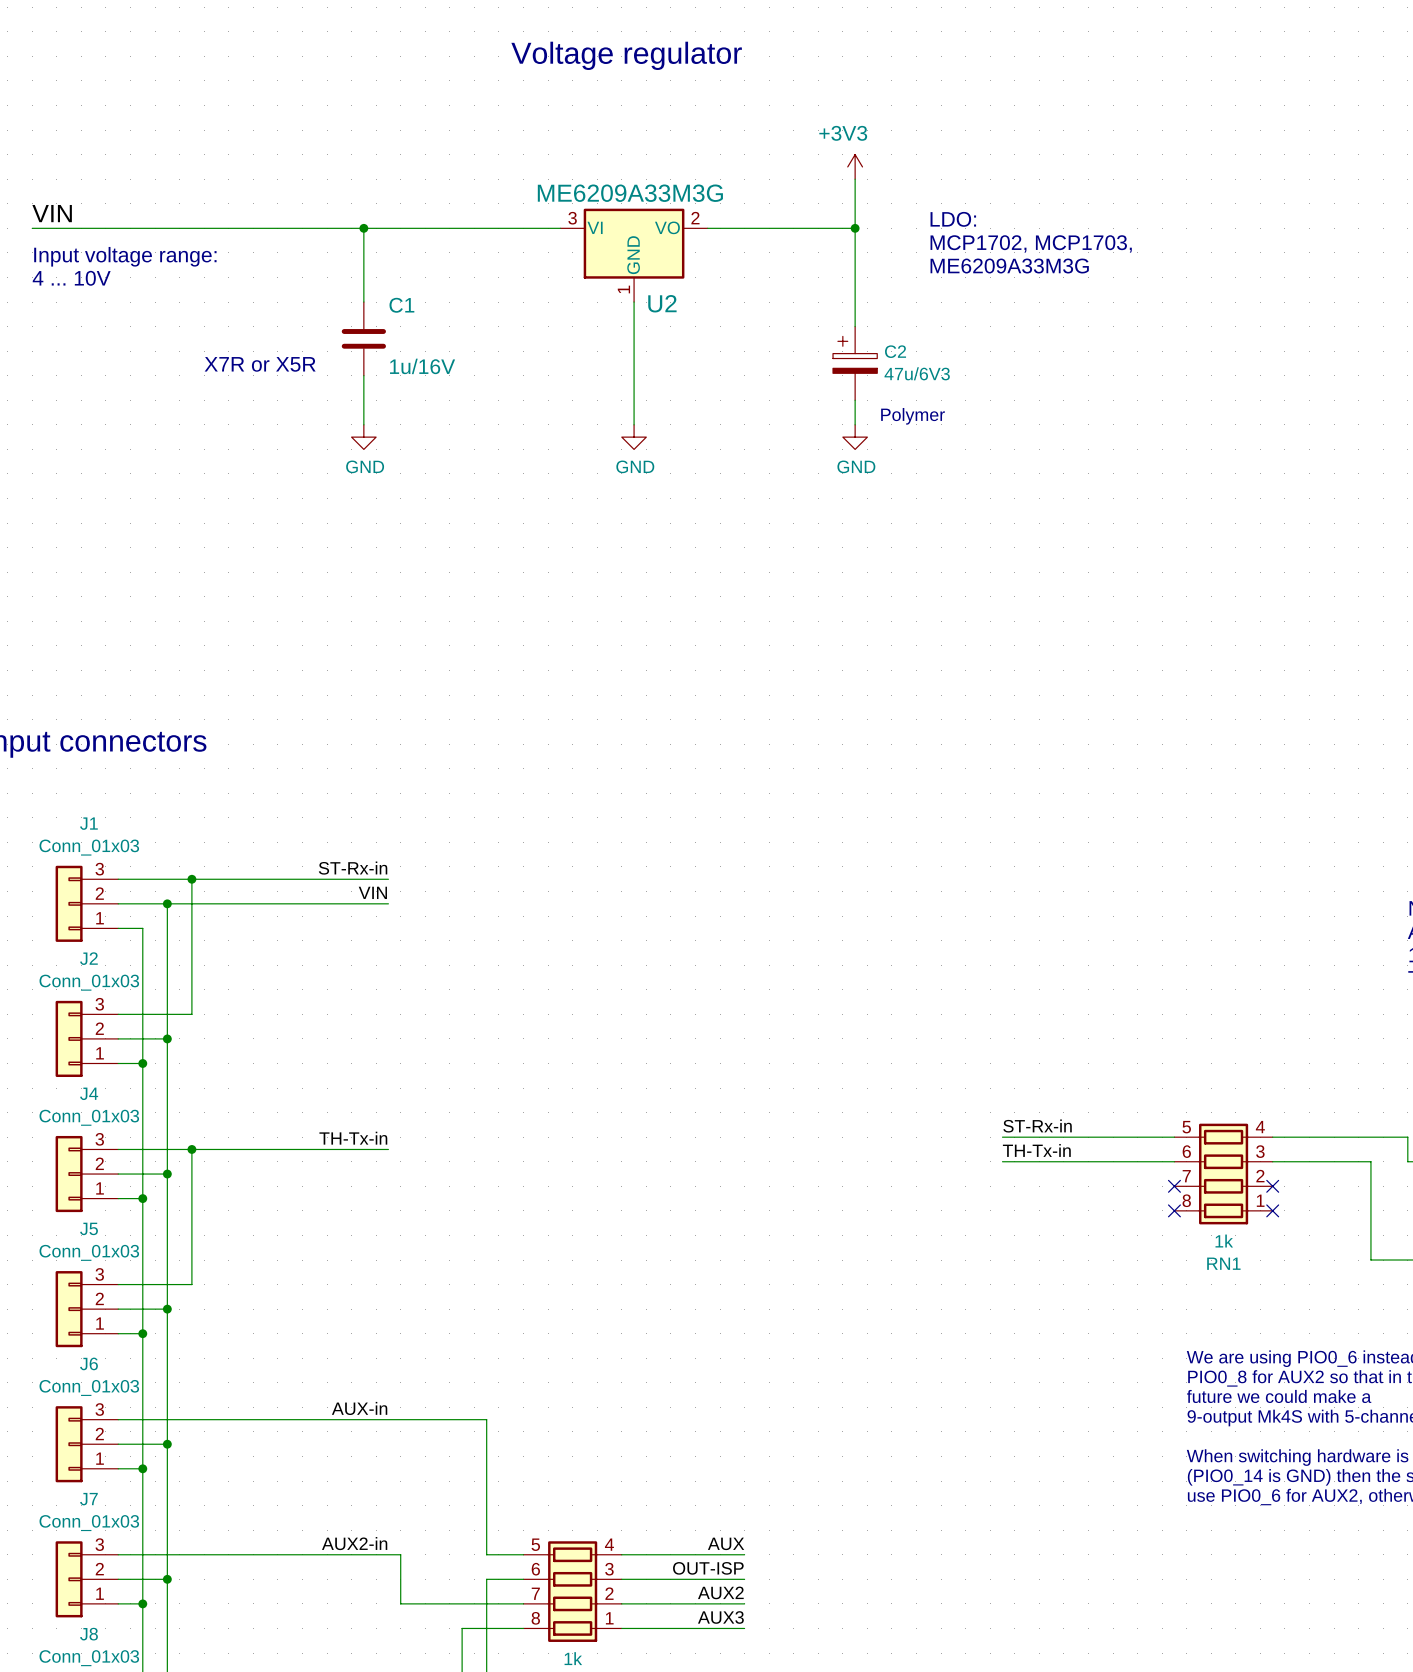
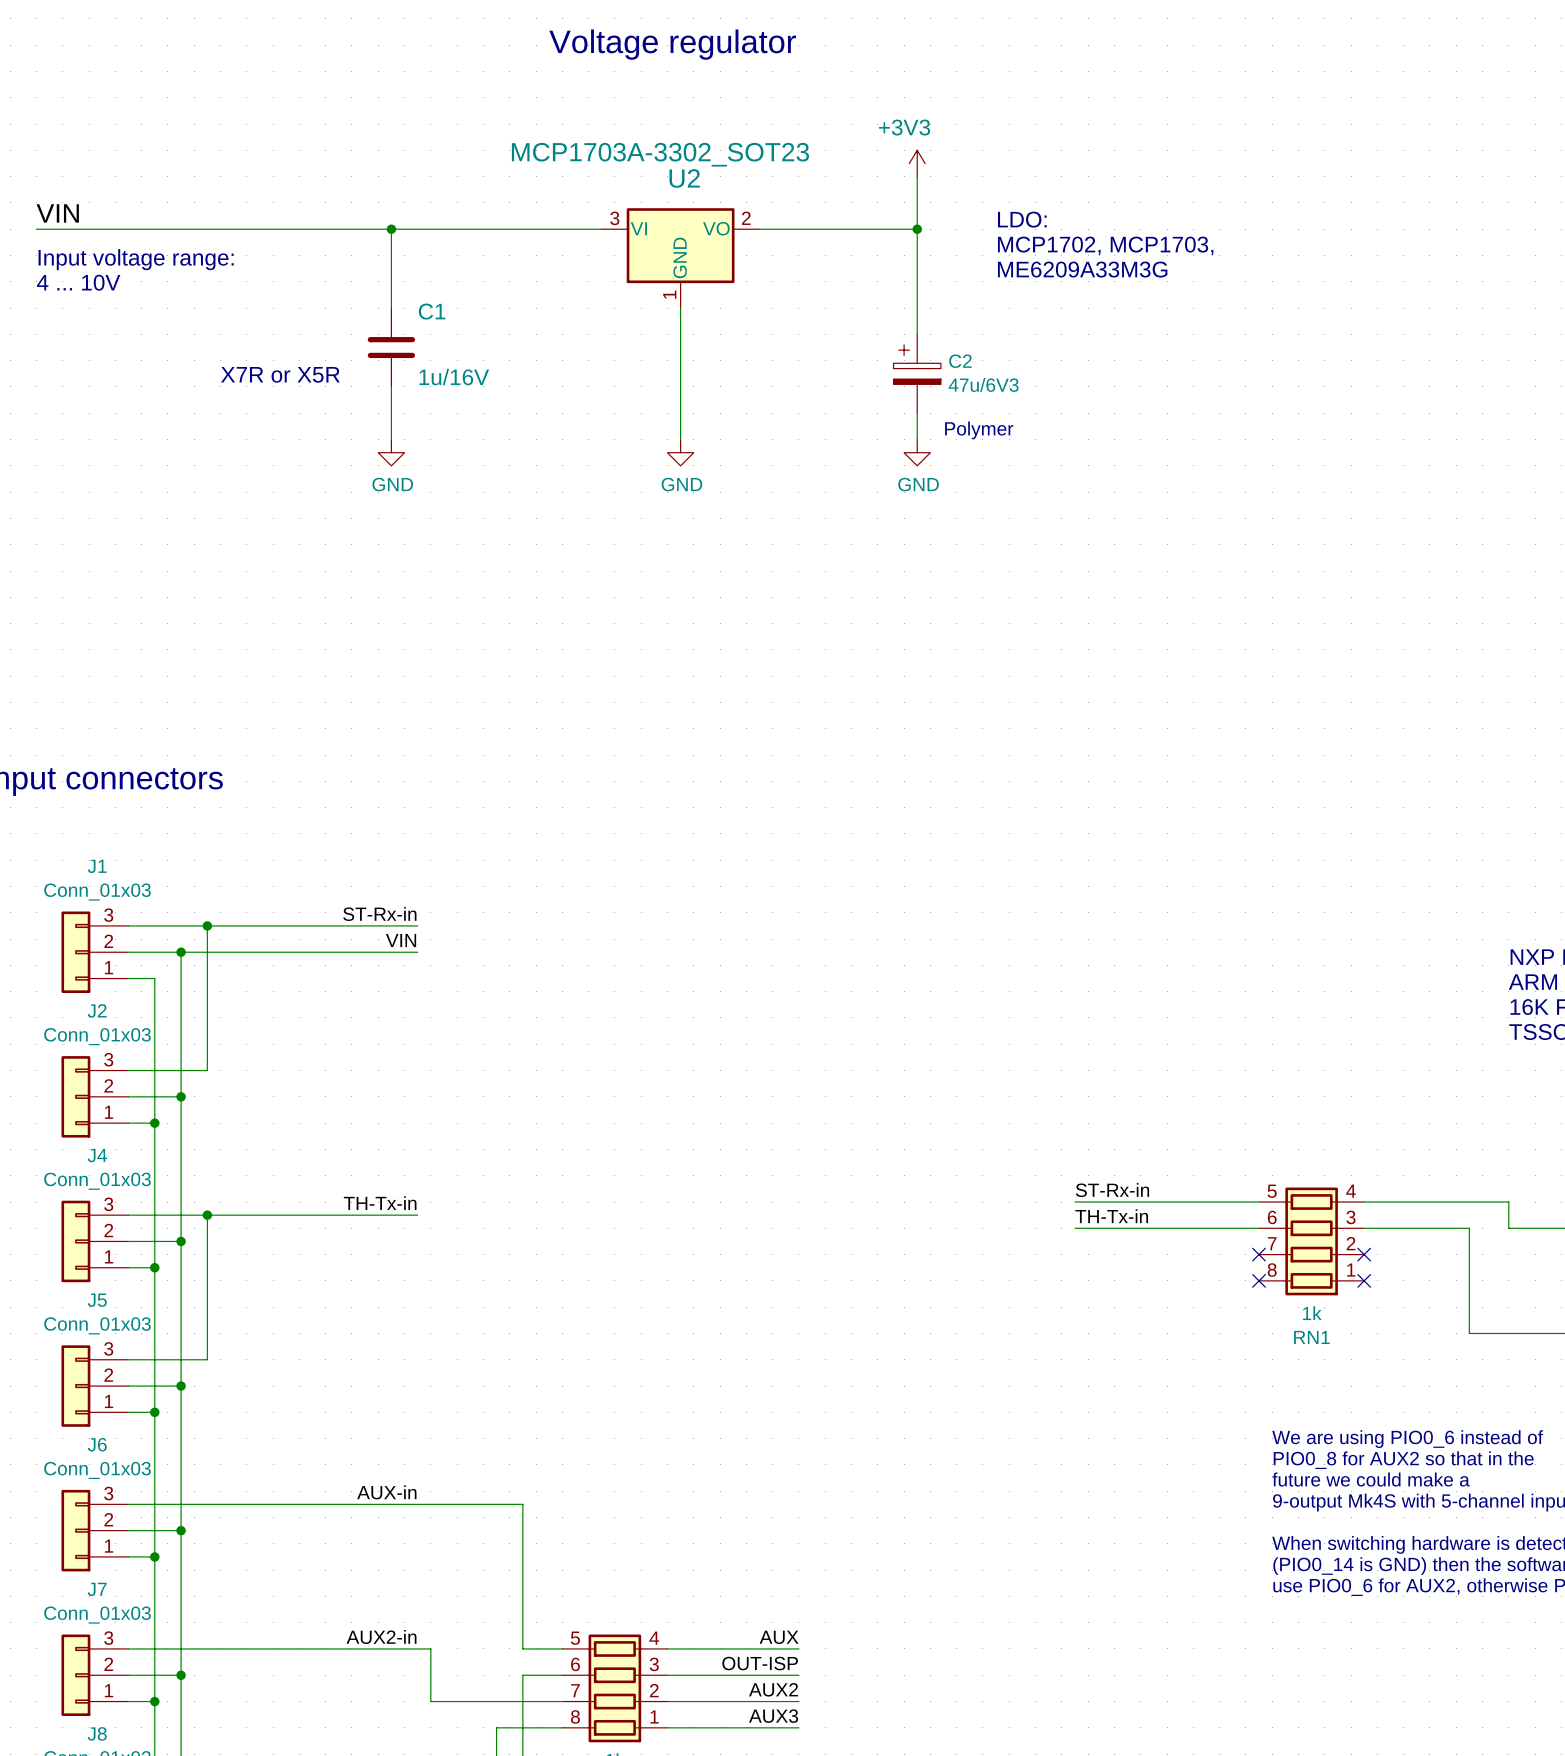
U2 value: ME6209A33M3G (630, 193) -> MCP1703A-3302_SOT23 (660, 154)
U2 name position: U2 (662, 303) -> U2 (684, 178)

